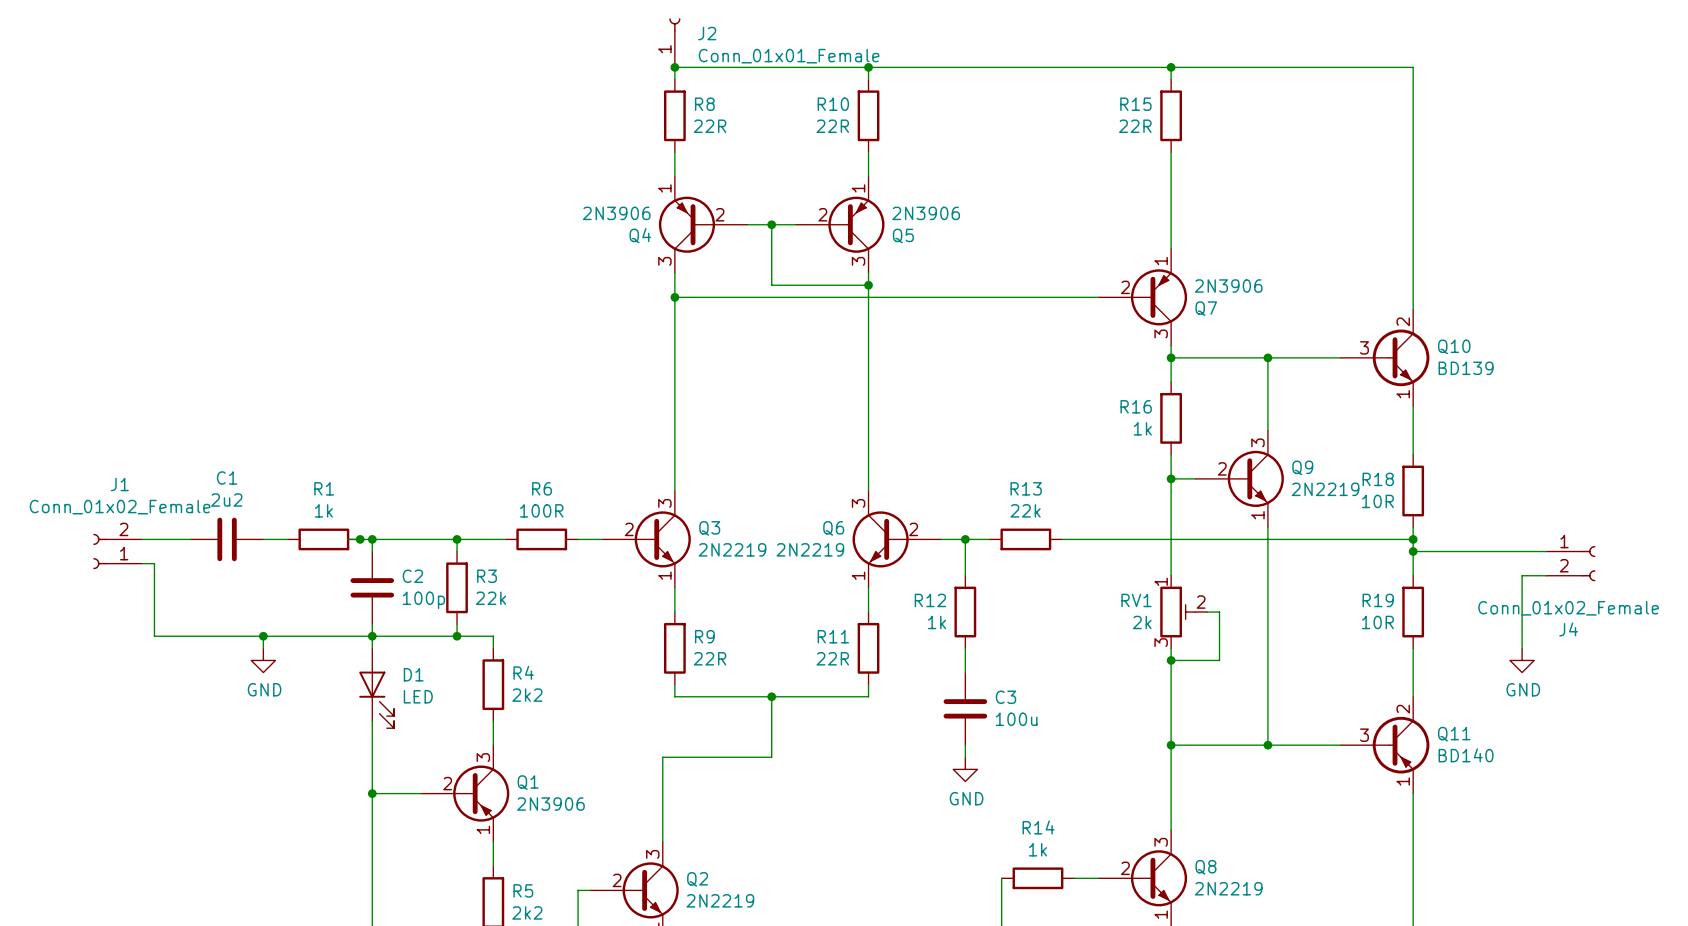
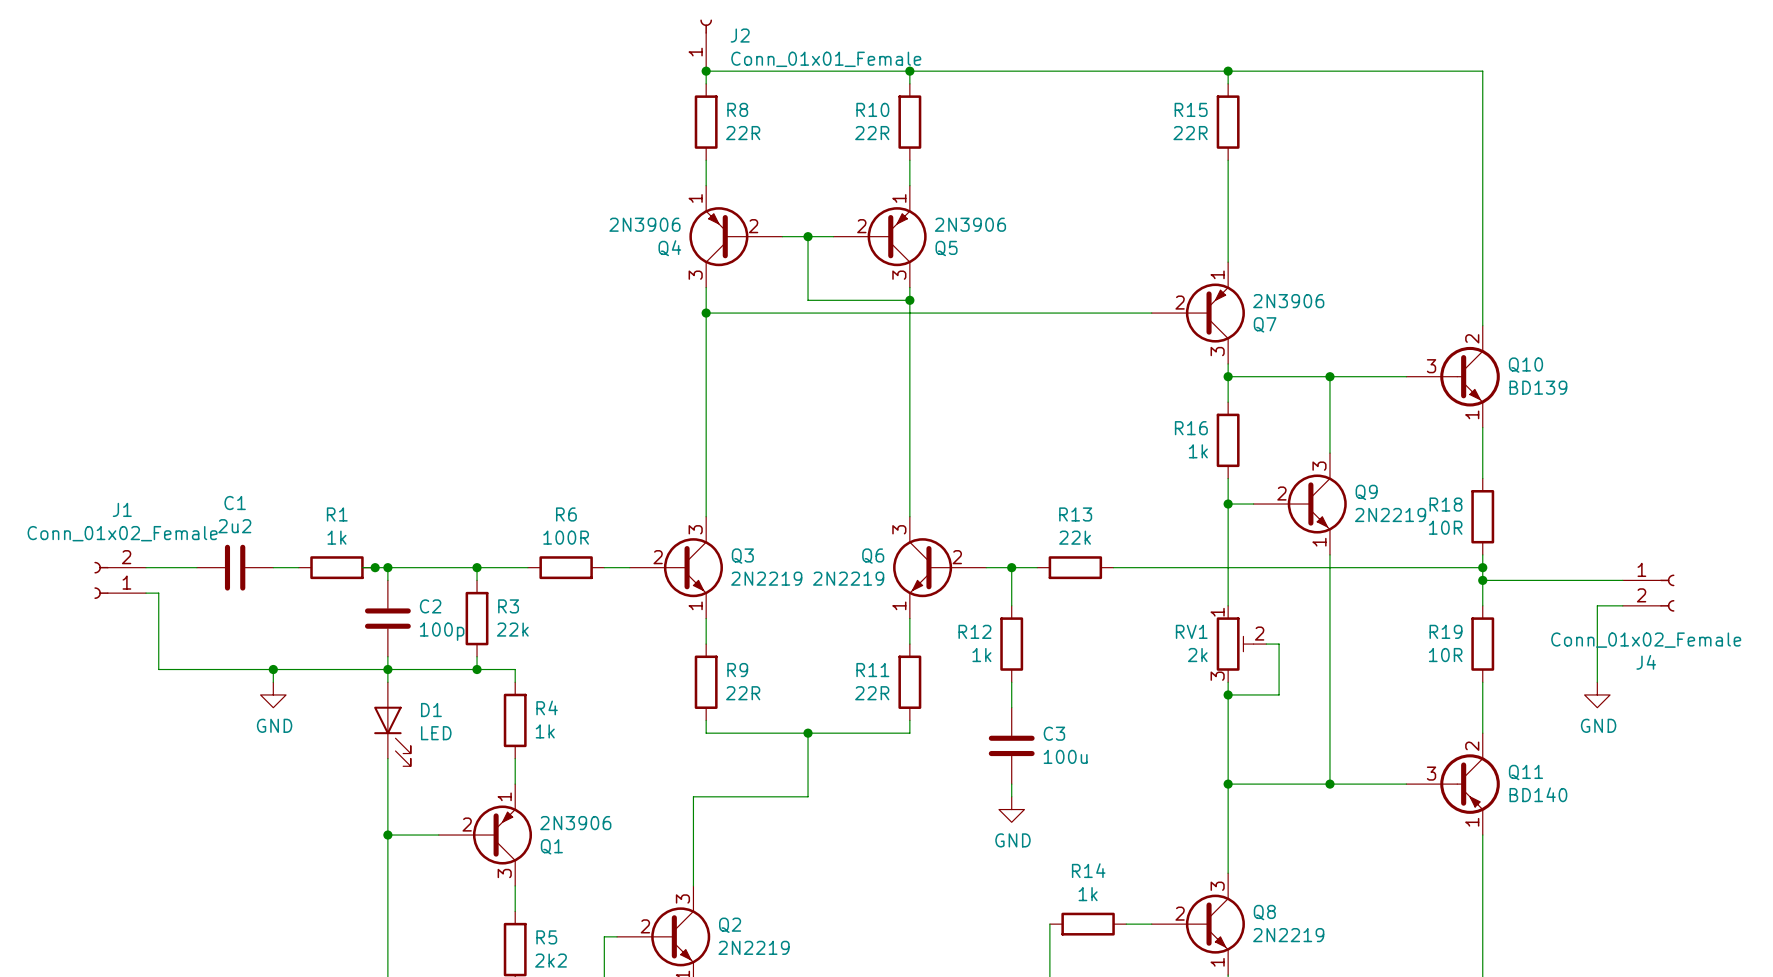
R4 value: 2k2 (527, 695) -> 1k (545, 731)
Q1 flip: as is (481, 793) -> up-down (502, 835)

